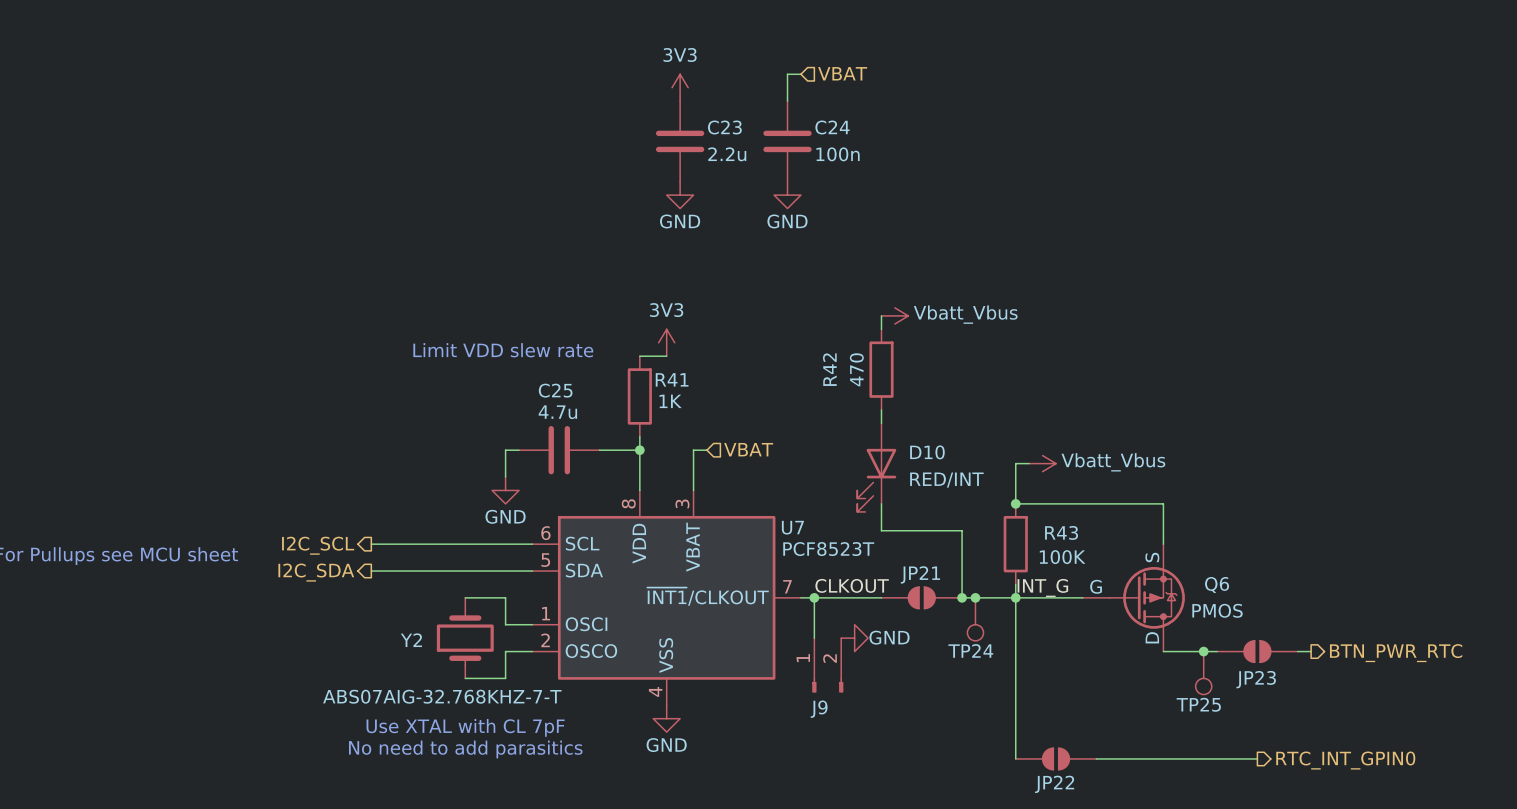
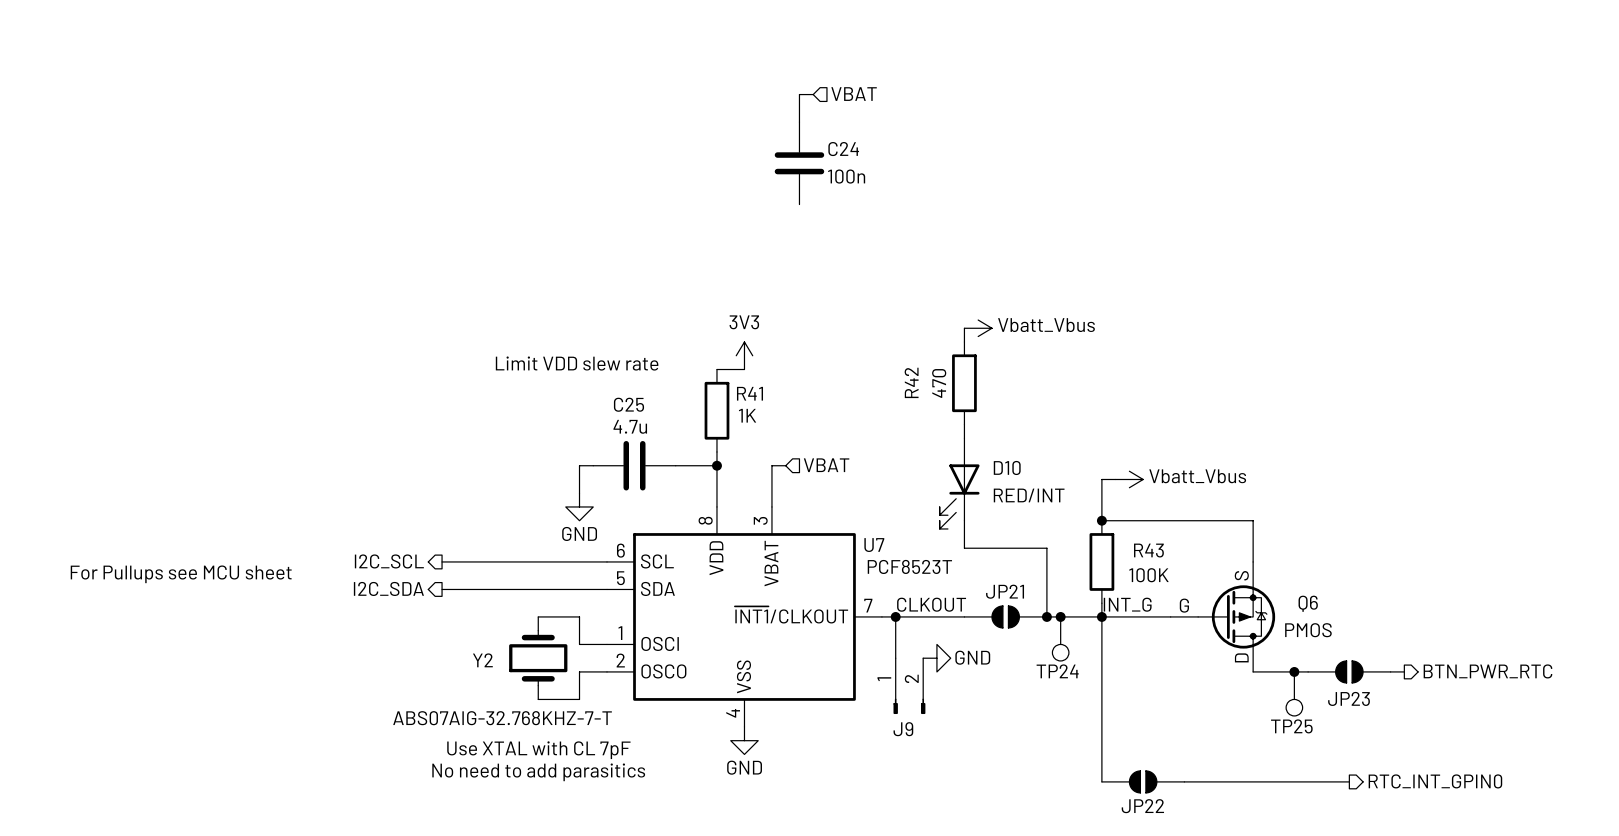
hierarchical label position: VBAT (842, 73) -> VBAT (854, 94)
wire: (800, 74) (787, 74) (787, 101) -> (813, 94) (799, 94) (799, 122)
power symbol: 3V3 (680, 87) -> none
C23: 2.2u (680, 141) -> none
C24 position: (787, 141) -> (799, 163)
power symbol: GND (680, 195) -> none
power symbol: GND (787, 195) -> none

